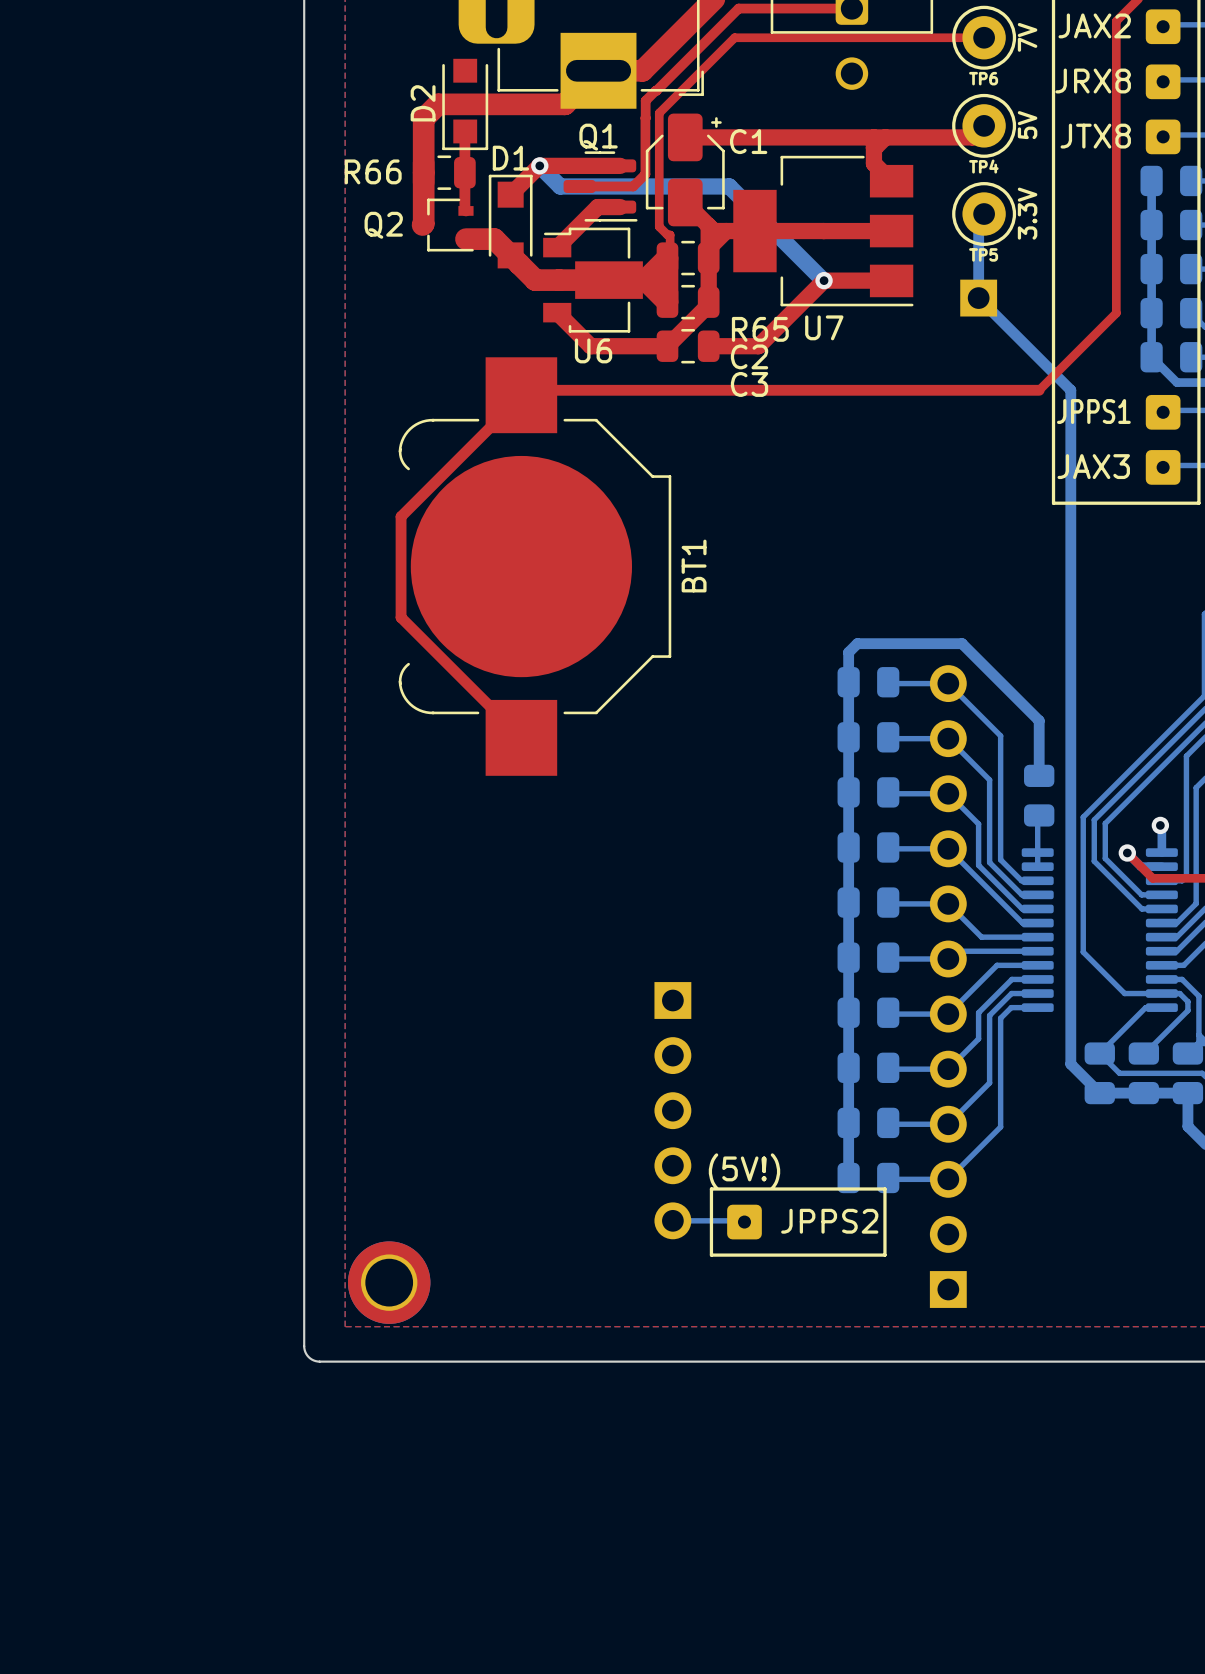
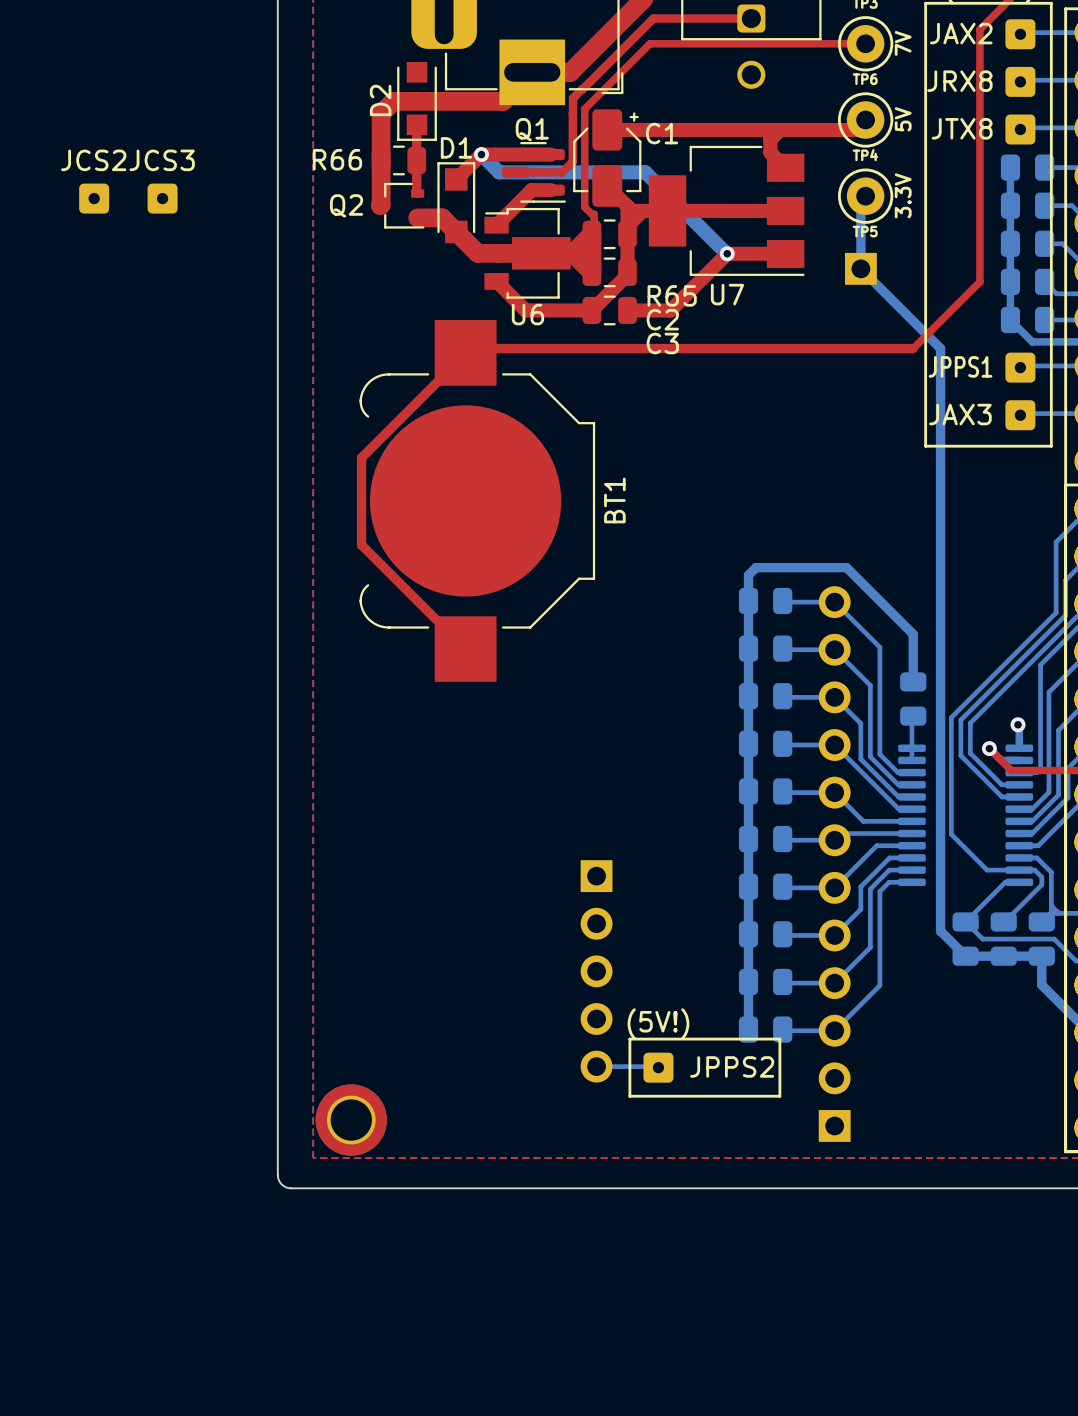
JCS2: none -> (94, 198)
JCS3: none -> (162, 198)

